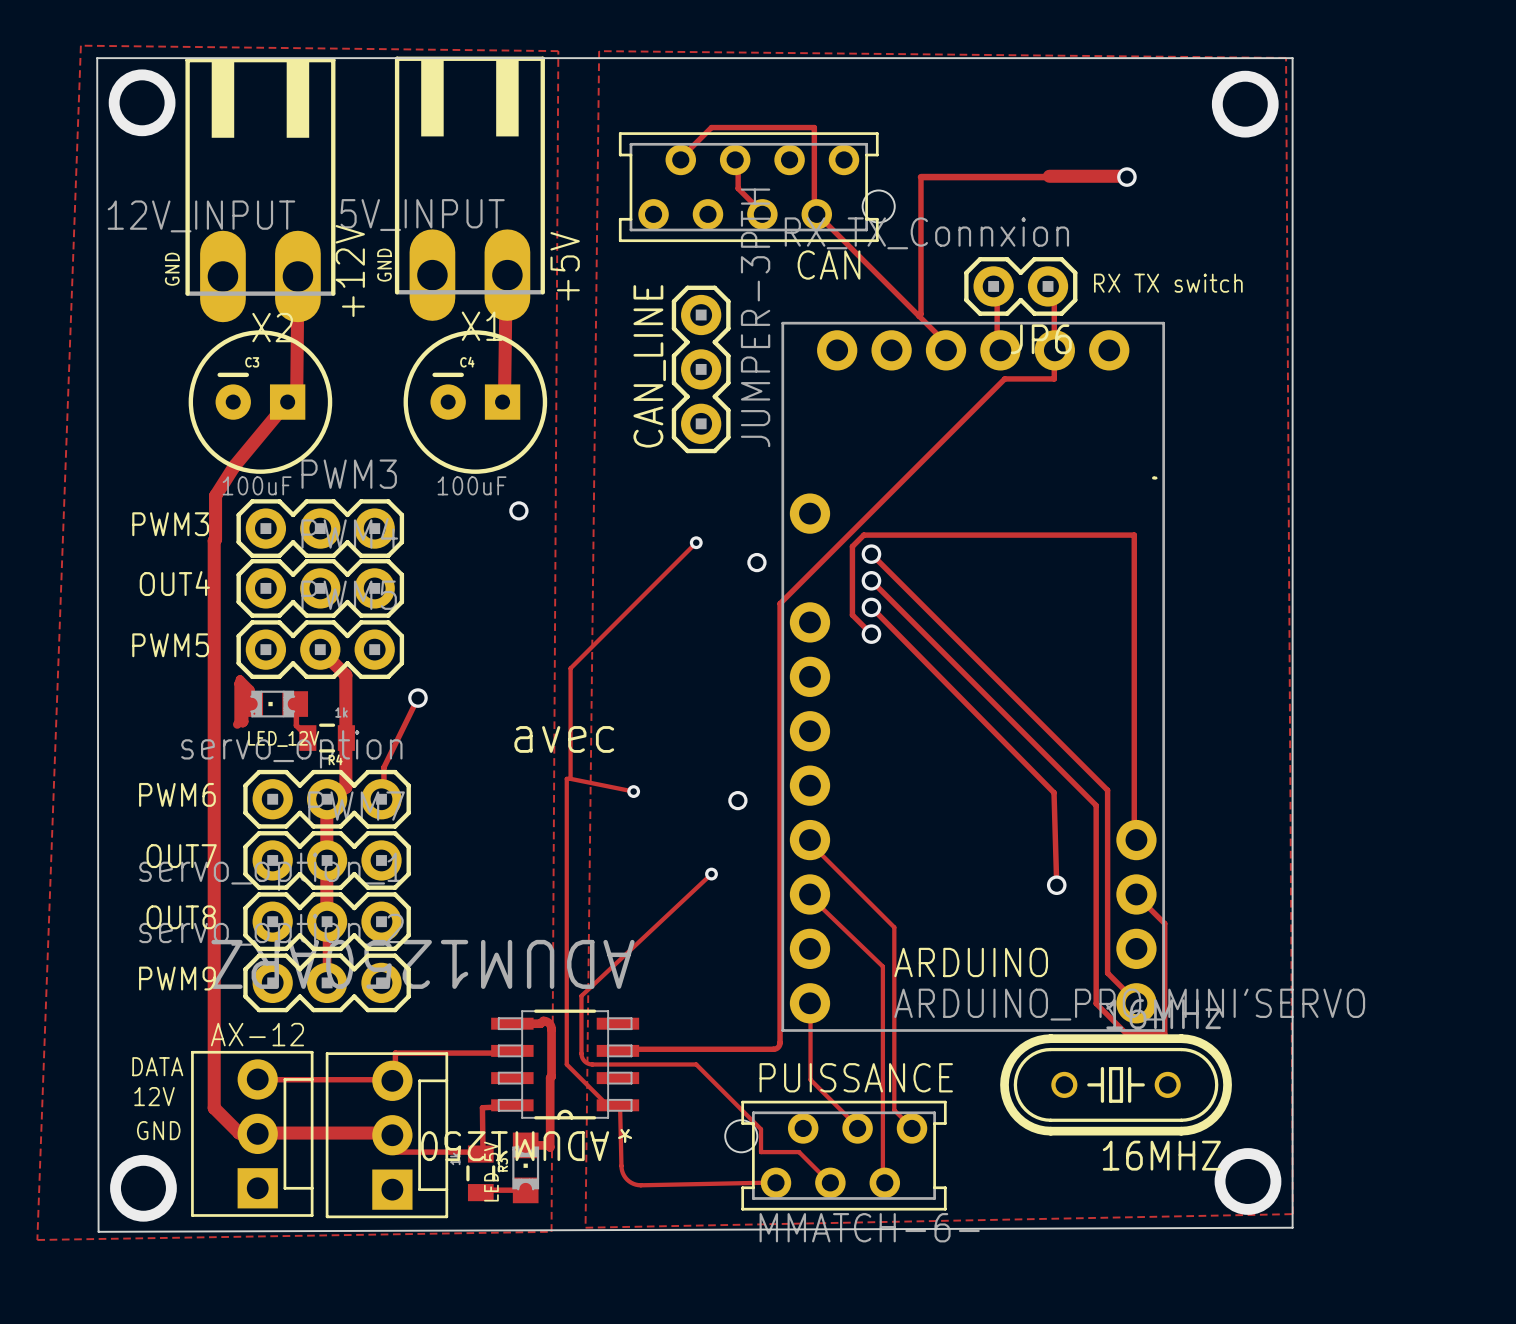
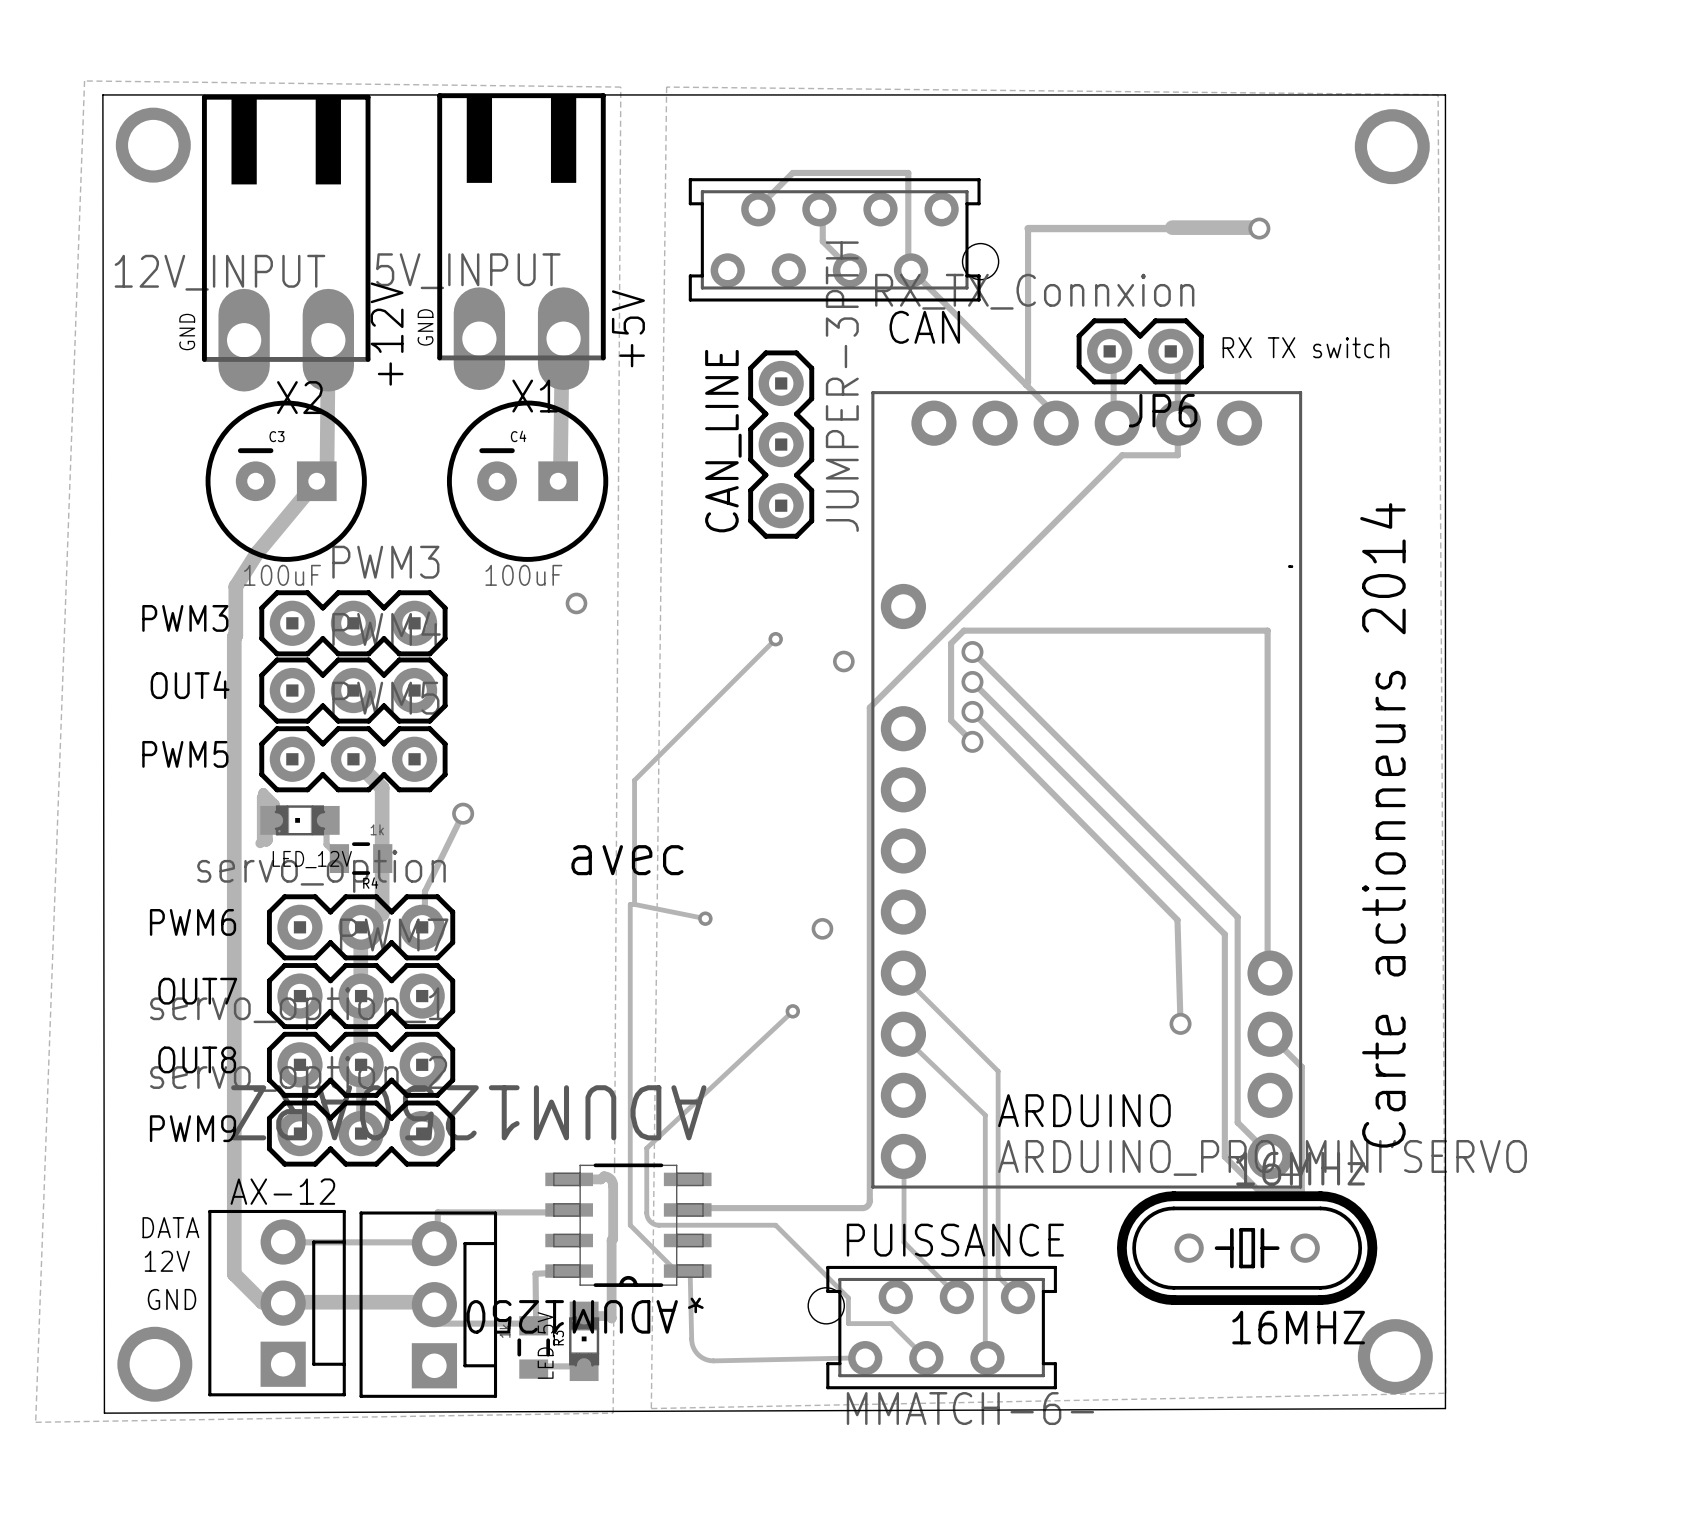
text: none -> Carte actionneurs 2014 (1382, 825)

